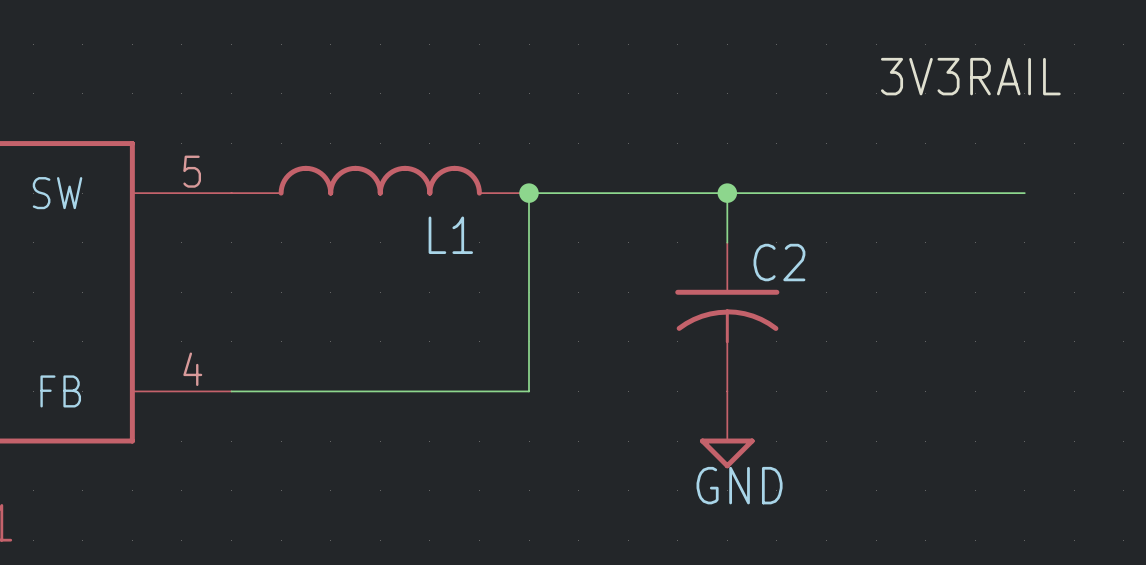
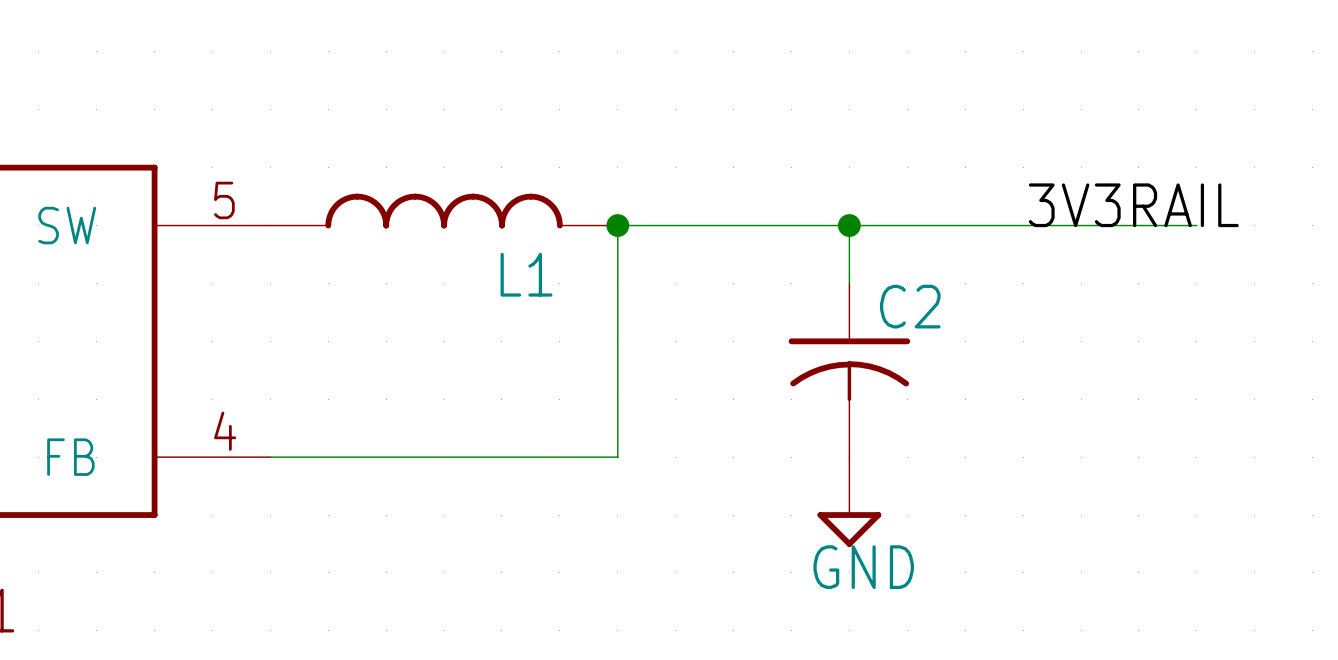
label position: 3V3RAIL (970, 76) -> 3V3RAIL (1133, 205)

